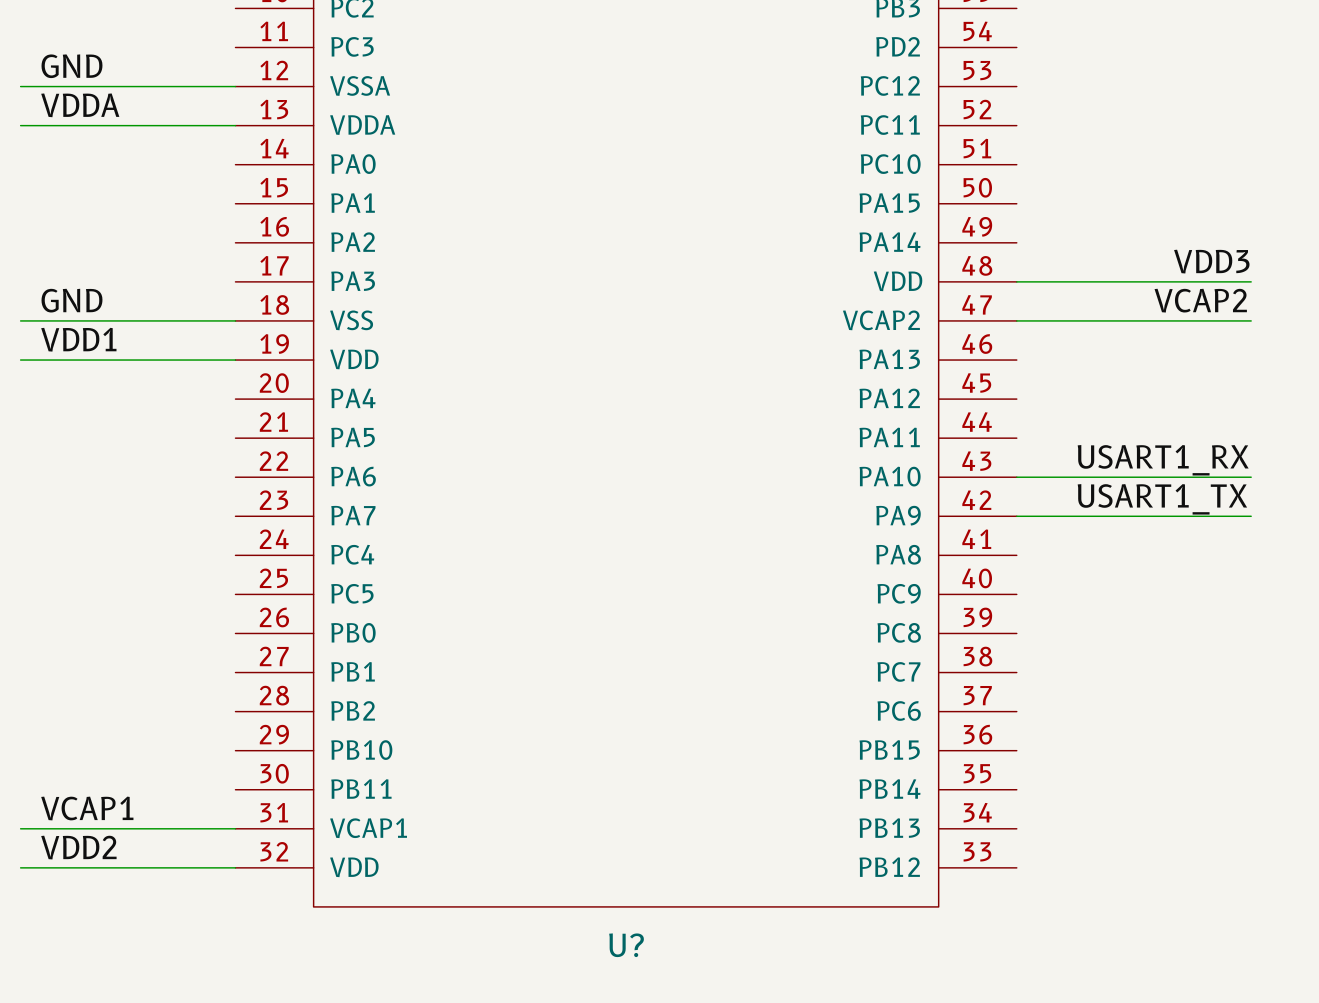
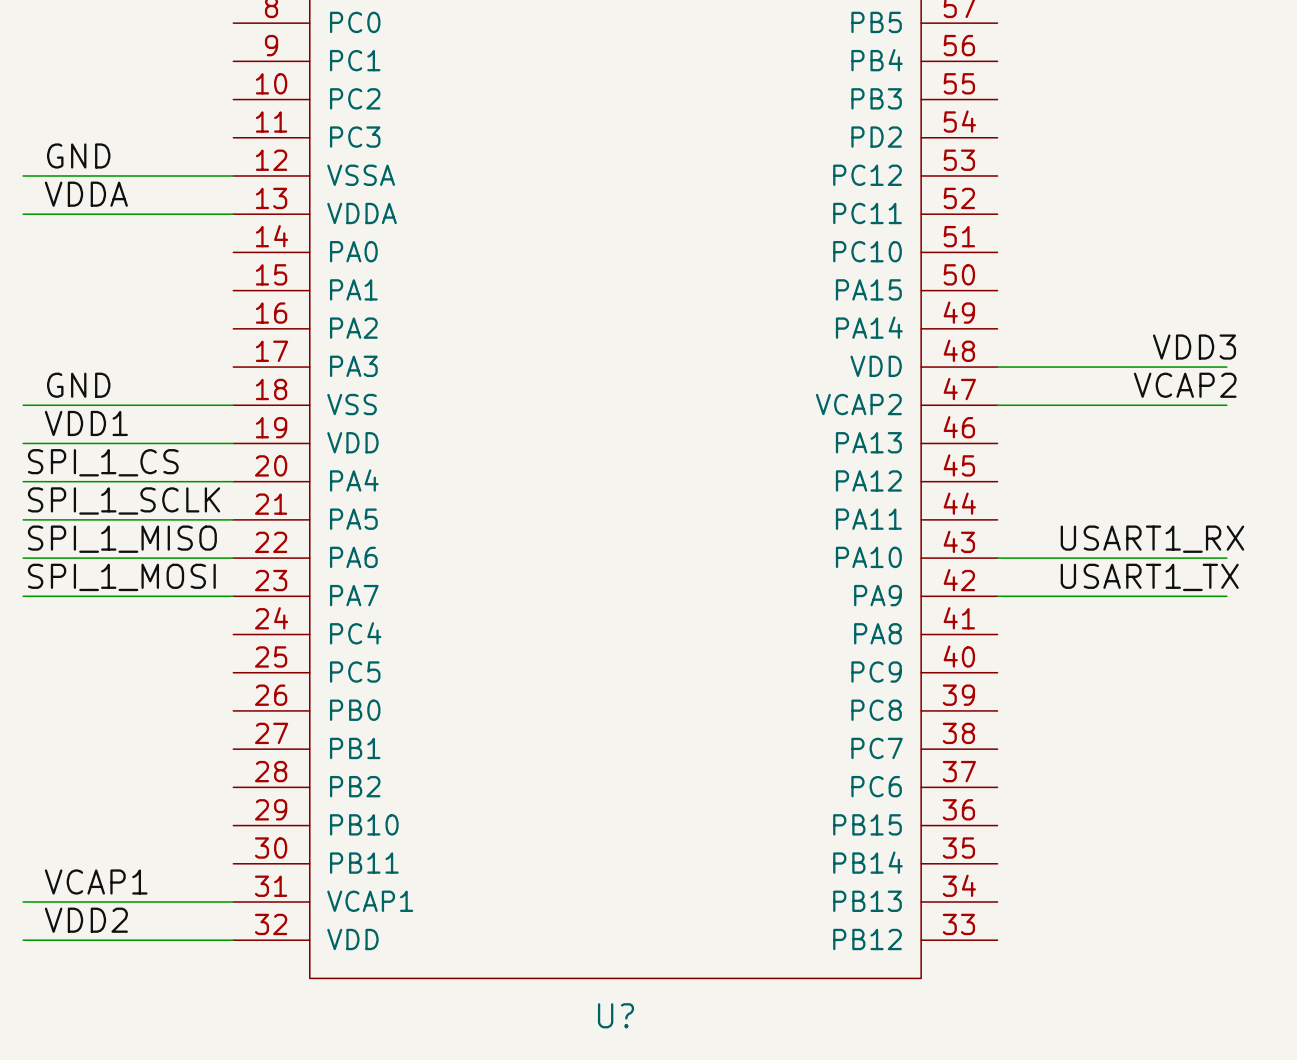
label: none -> SPI_1_CS (103, 462)
wire: none -> (23, 481) (233, 481)
label: none -> SPI_1_SCLK (124, 500)
wire: none -> (23, 519) (233, 519)
label: none -> SPI_1_MISO (122, 539)
wire: none -> (23, 558) (233, 558)
label: none -> SPI_1_MOSI (121, 577)
wire: none -> (23, 596) (233, 596)

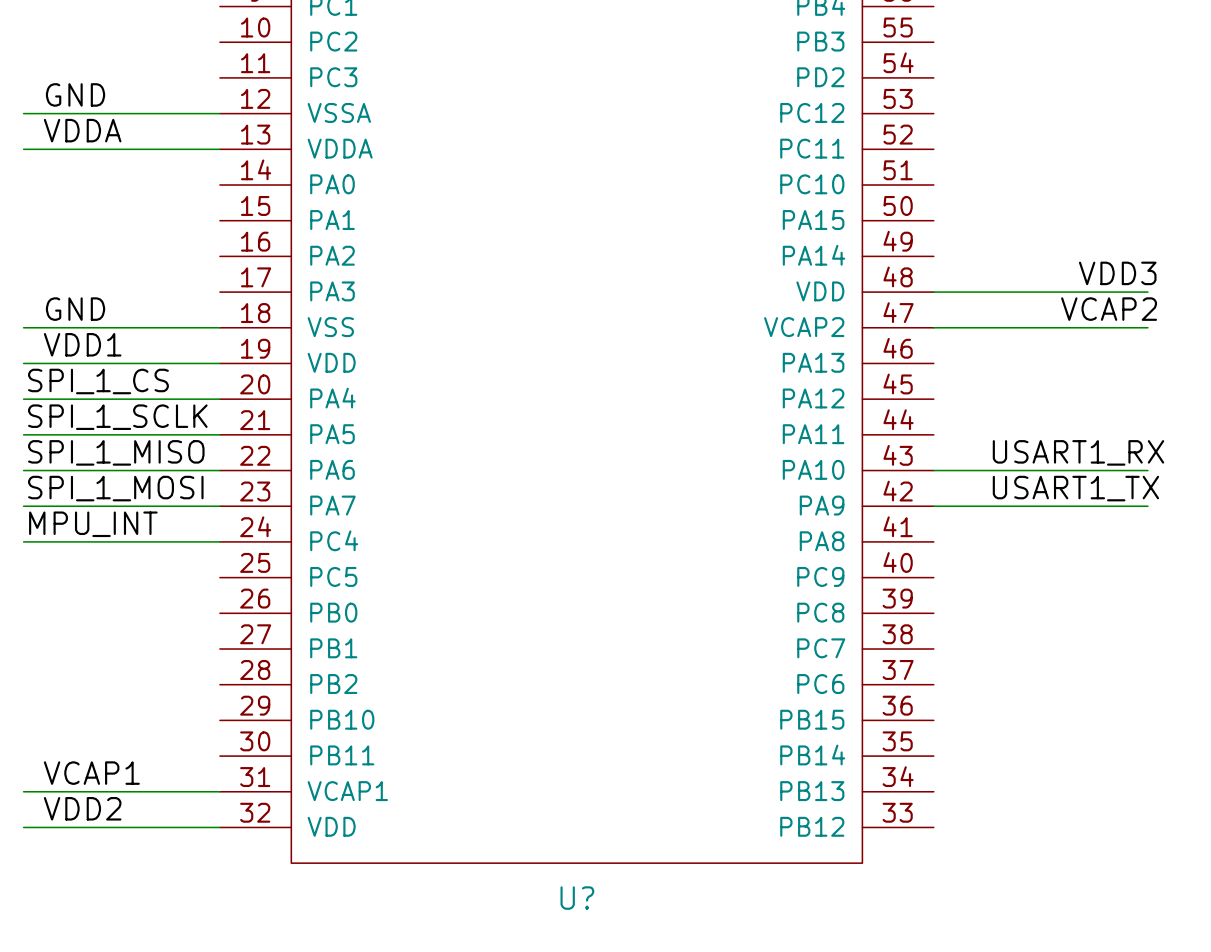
label: none -> MPU_INT (93, 524)
wire: none -> (23, 541) (219, 541)

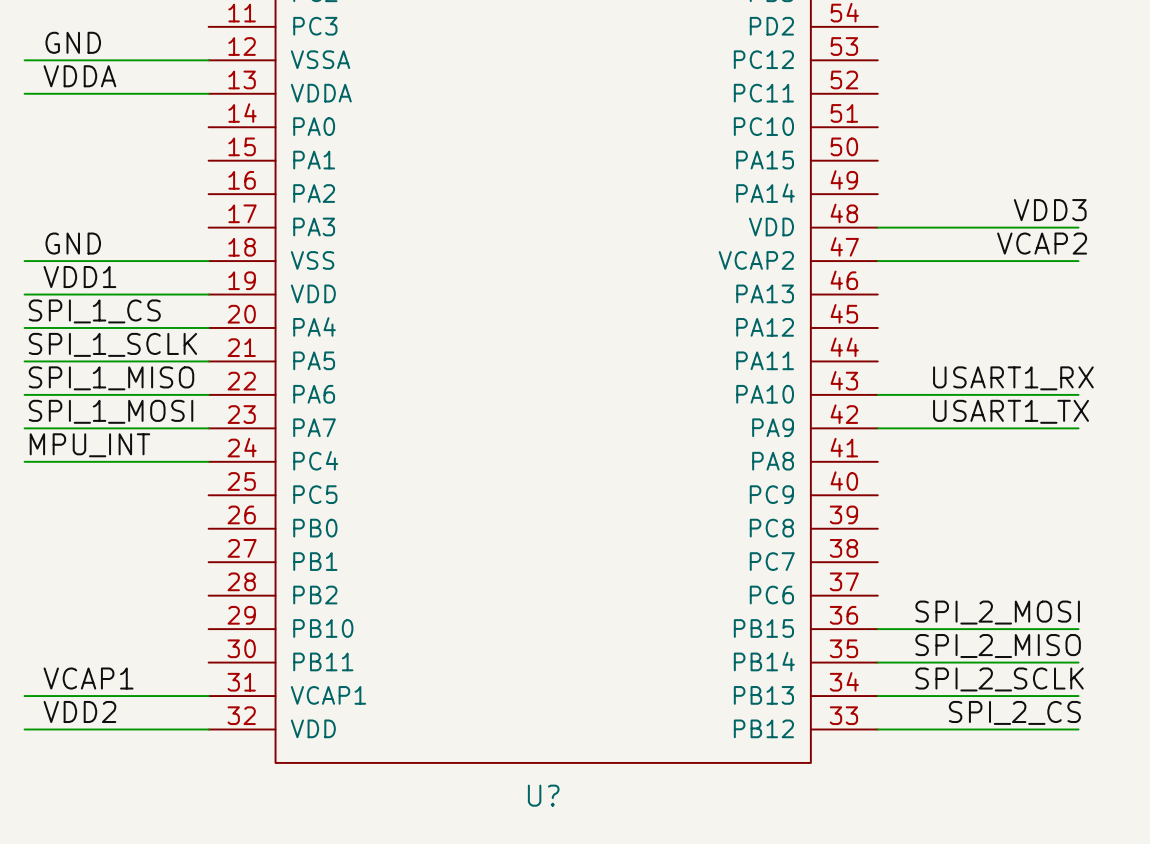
label: none -> SPI_2_MOSI (997, 612)
wire: none -> (877, 629) (1078, 629)
label: none -> SPI_2_MISO (998, 646)
wire: none -> (877, 662) (1078, 662)
label: none -> SPI_2_SCLK (999, 679)
wire: none -> (877, 696) (1078, 696)
label: none -> SPI_2_CS (1014, 712)
wire: none -> (877, 729) (1078, 729)

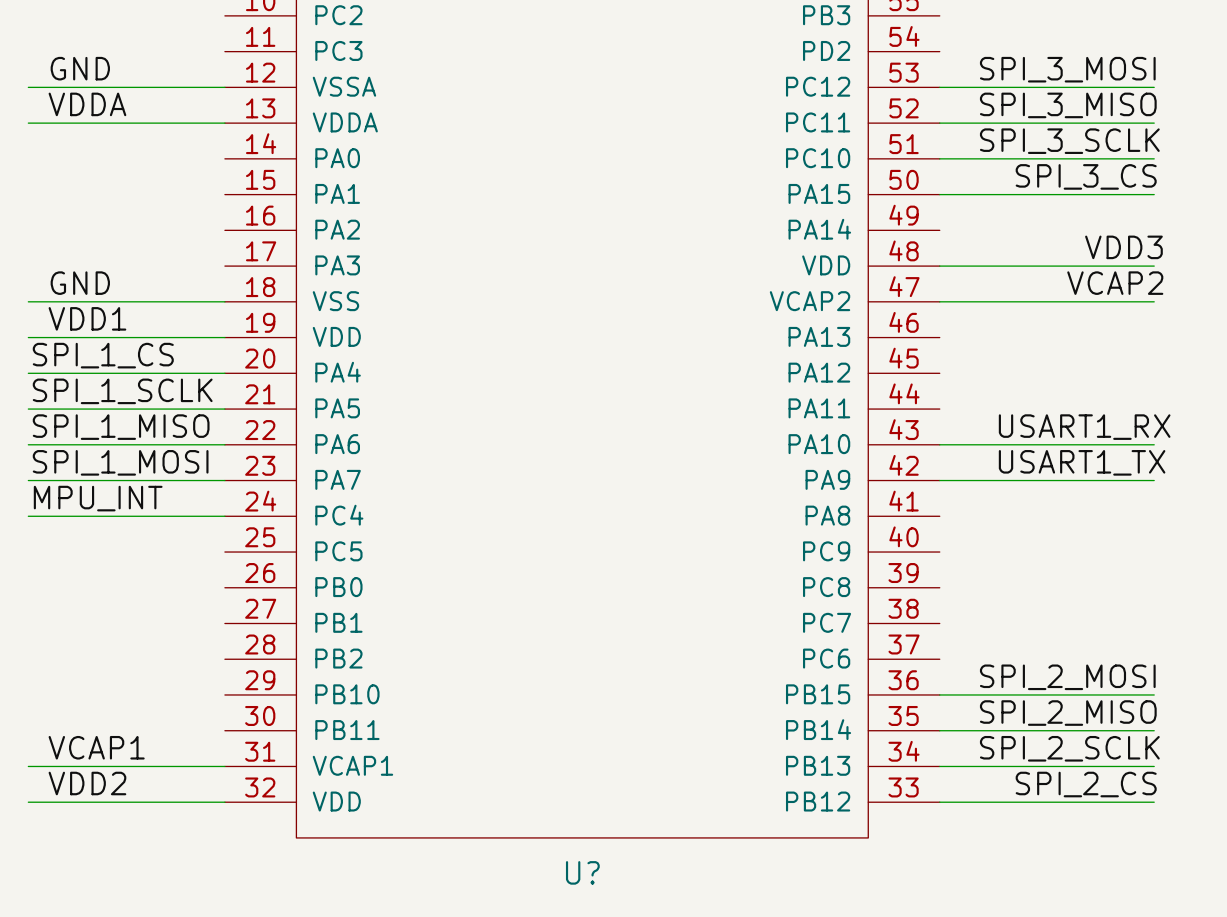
label: none -> SPI_3_MOSI (1067, 69)
wire: none -> (939, 87) (1154, 87)
label: none -> SPI_3_MISO (1068, 105)
wire: none -> (939, 123) (1154, 123)
label: none -> SPI_3_SCLK (1069, 141)
wire: none -> (939, 158) (1154, 158)
label: none -> SPI_3_CS (1086, 176)
wire: none -> (939, 194) (1154, 194)

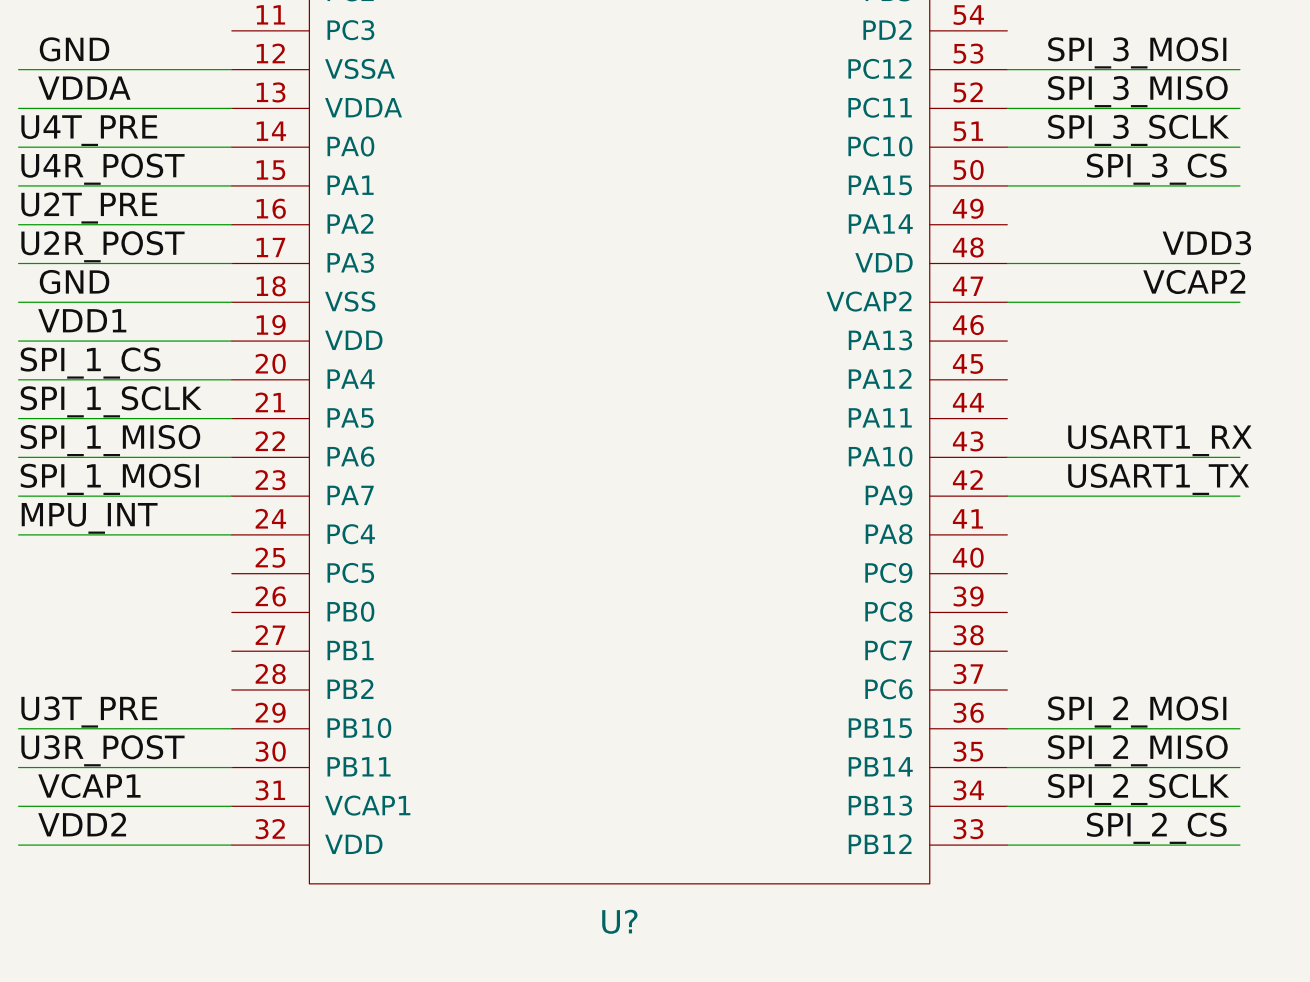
label: none -> U4T_PRE (89, 130)
wire: none -> (18, 147) (231, 147)
label: none -> U4R_POST (102, 169)
wire: none -> (18, 185) (231, 185)
label: none -> U2T_PRE (89, 207)
wire: none -> (18, 224) (231, 224)
label: none -> U2R_POST (102, 246)
wire: none -> (18, 263) (231, 263)
label: none -> U3T_PRE (89, 712)
wire: none -> (18, 728) (231, 728)
label: none -> U3R_POST (102, 750)
wire: none -> (18, 767) (231, 767)

